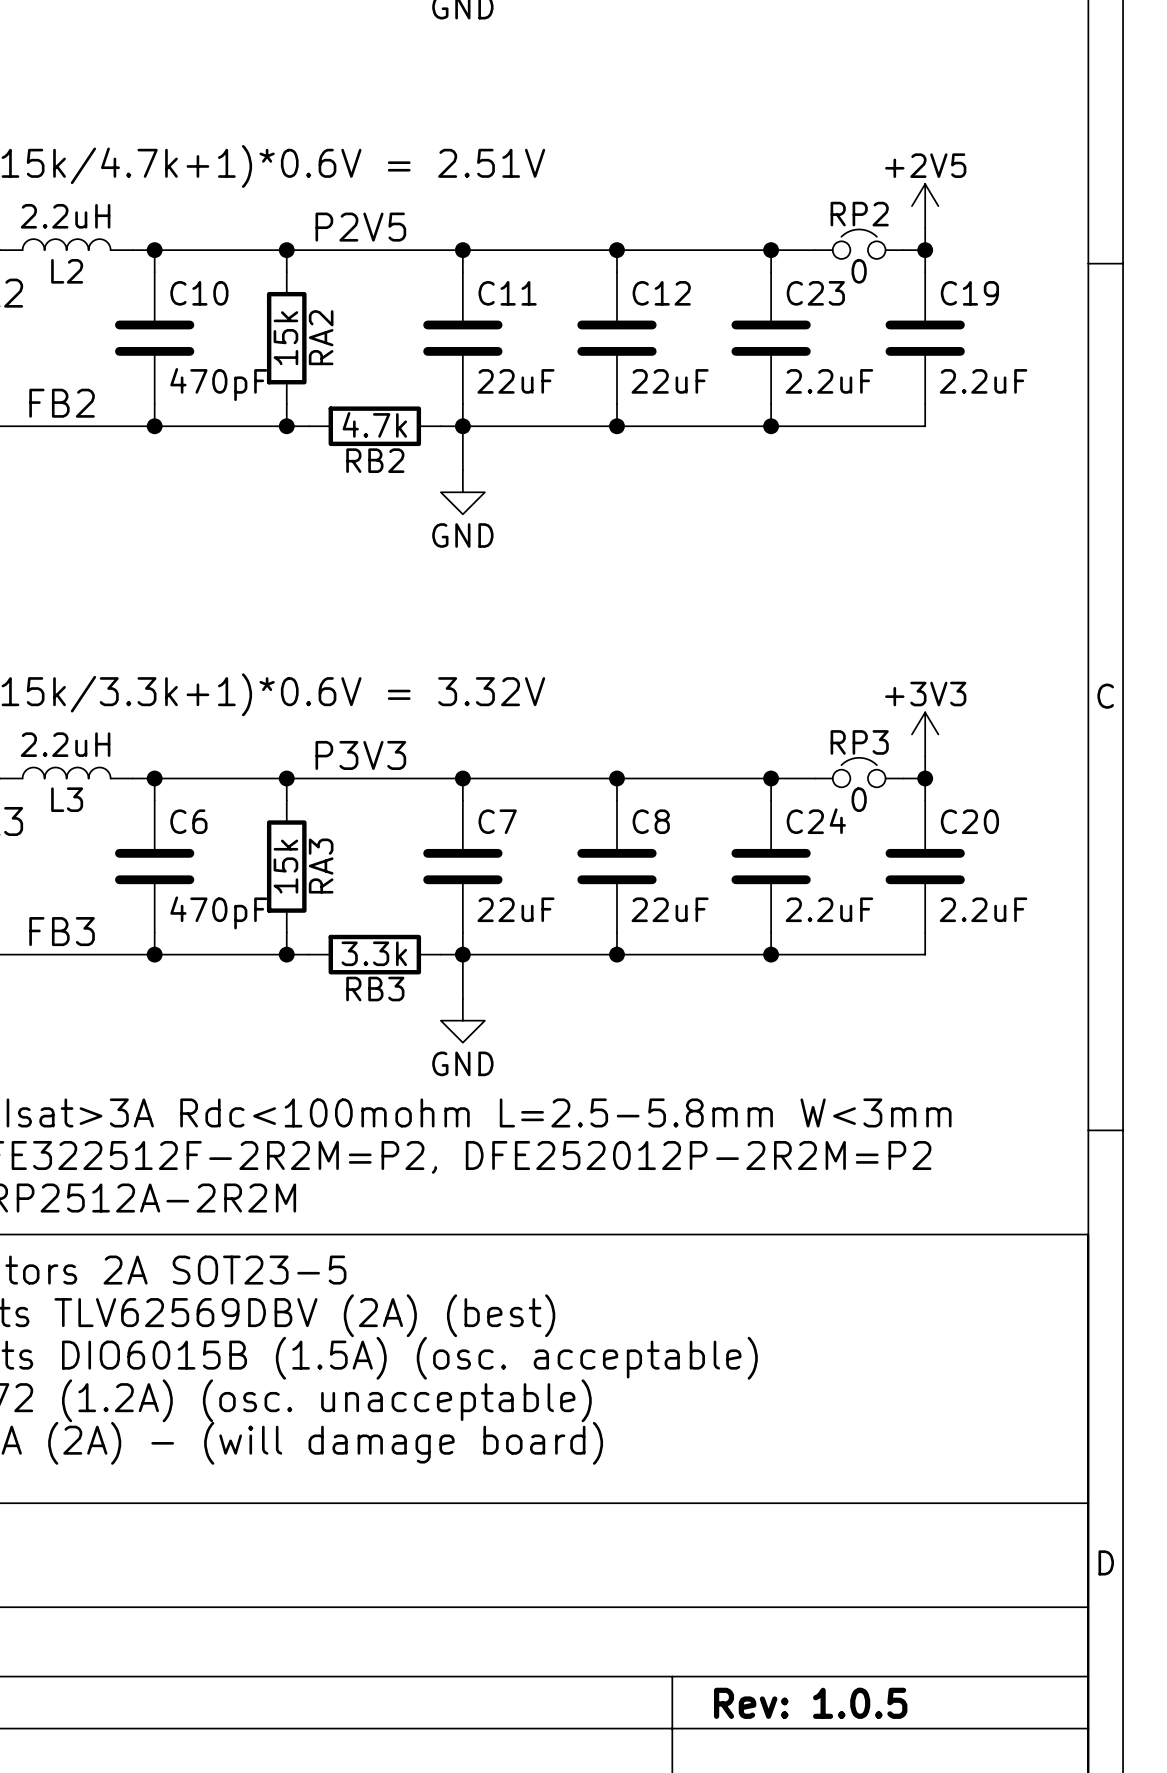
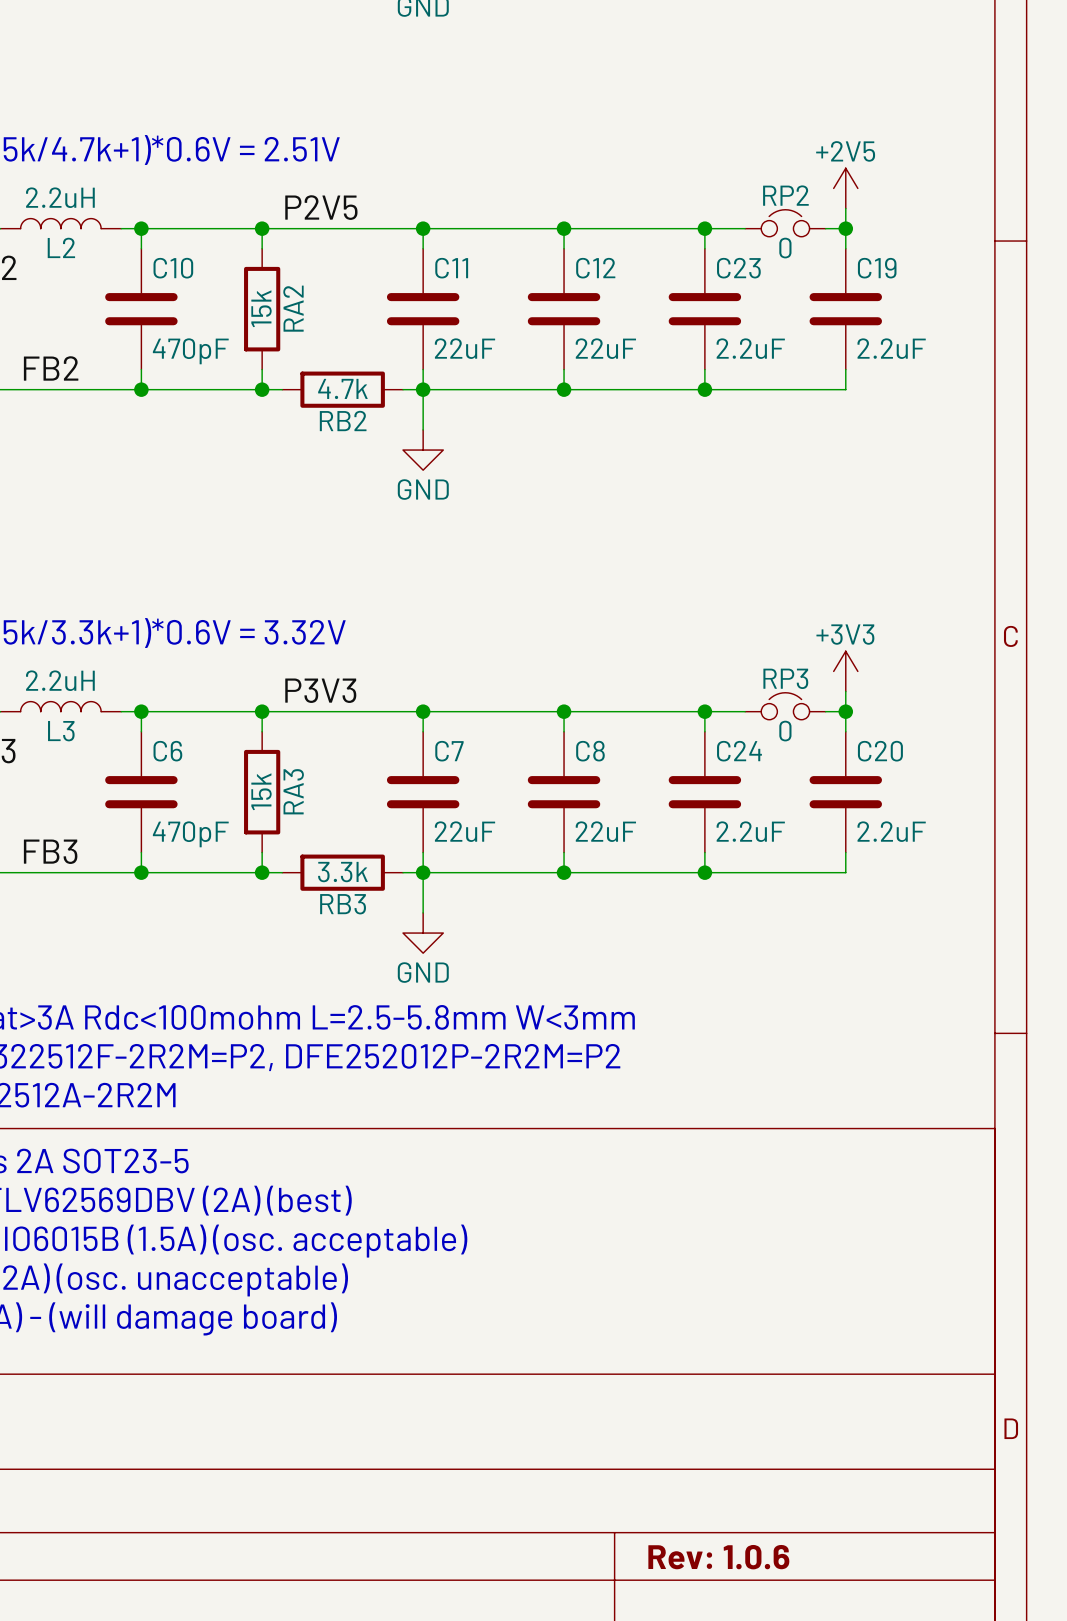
title block: Rev: 1.0.5 (810, 1703) -> Rev: 1.0.6 (718, 1557)

